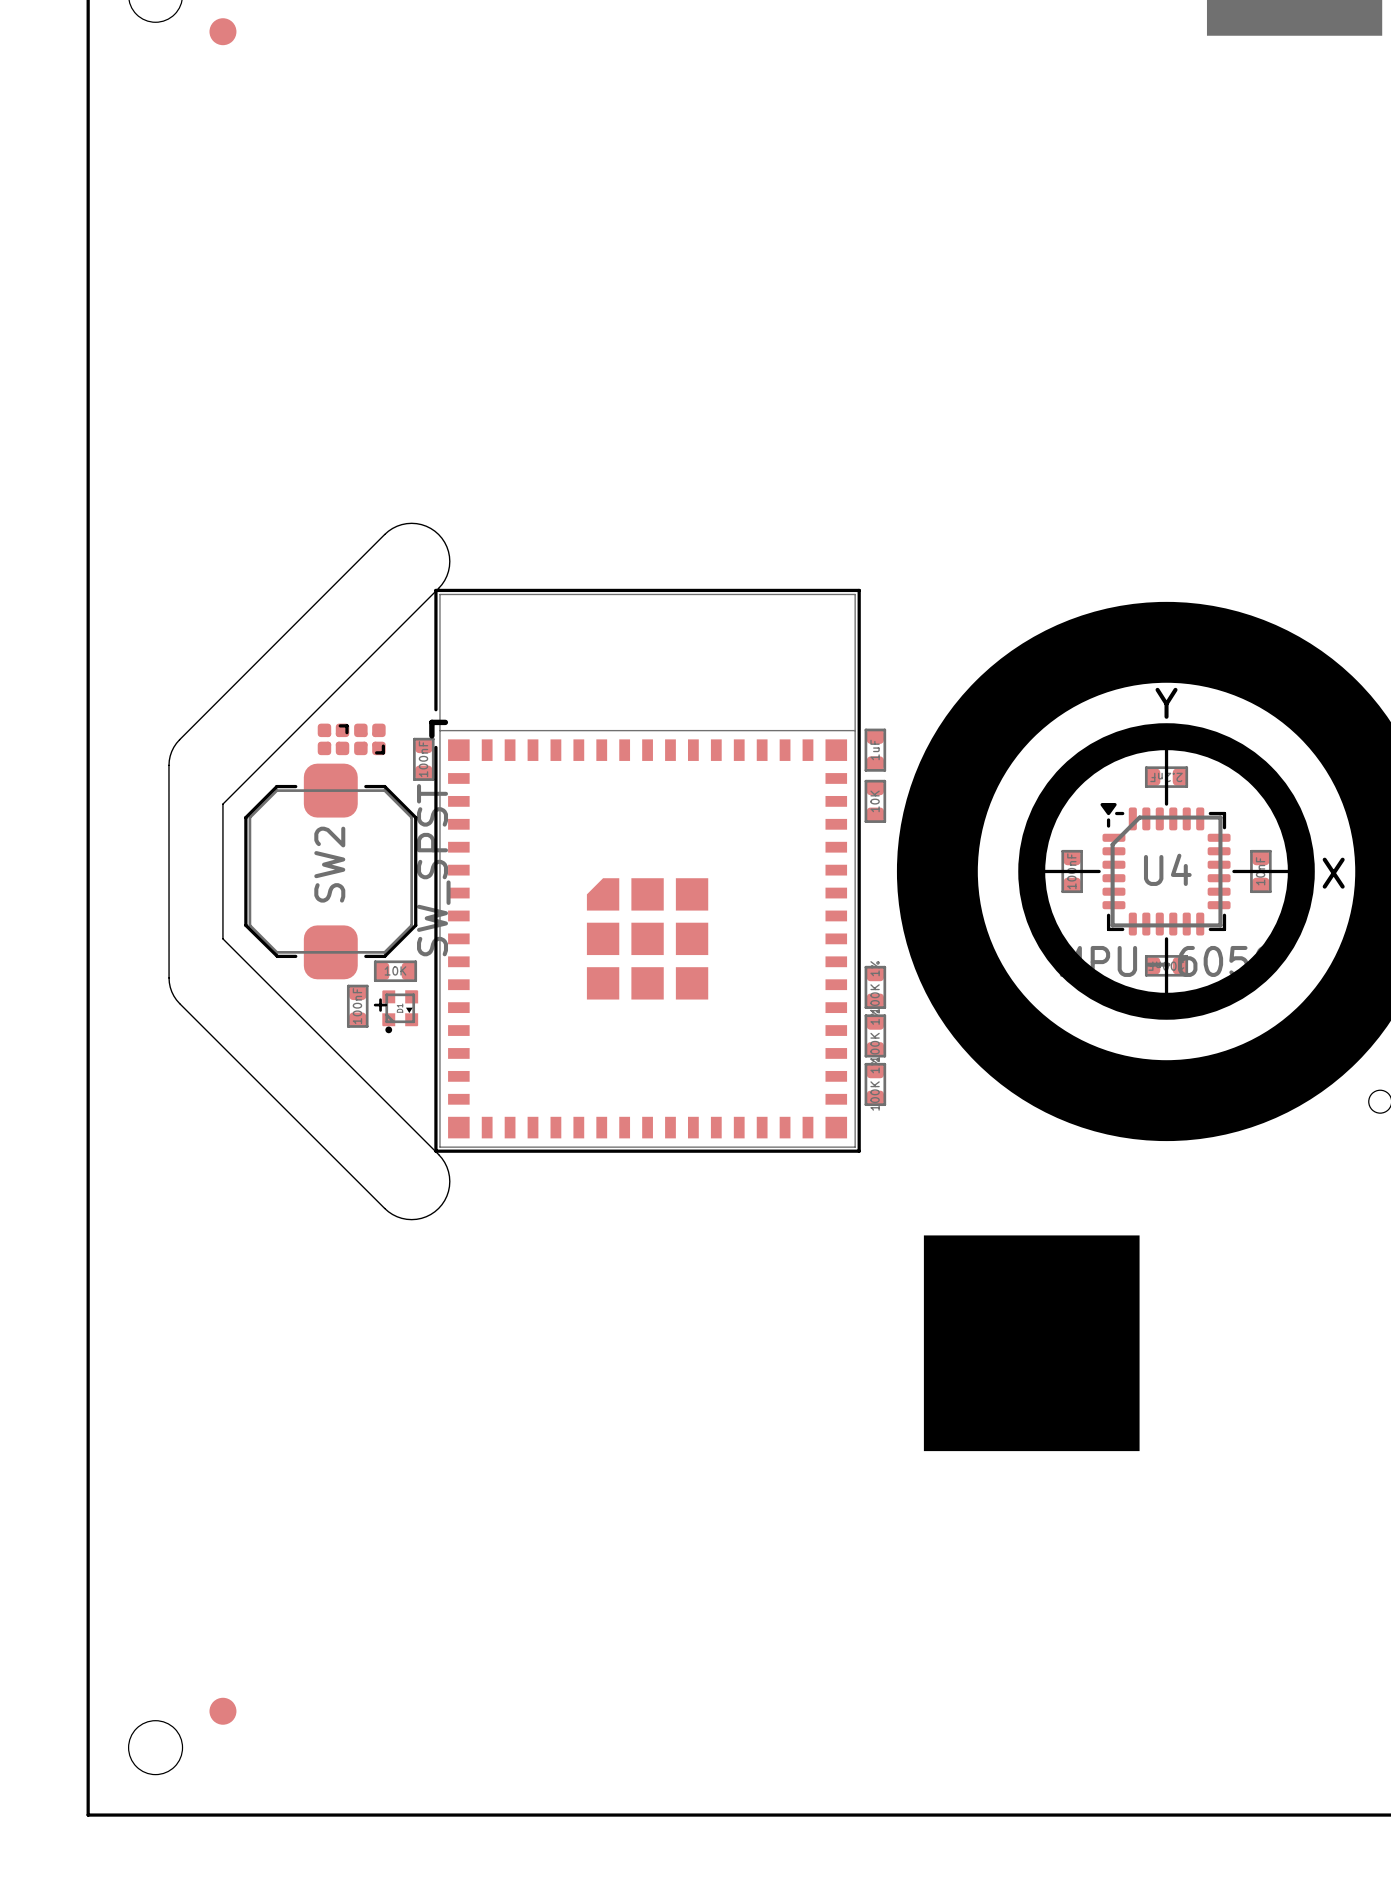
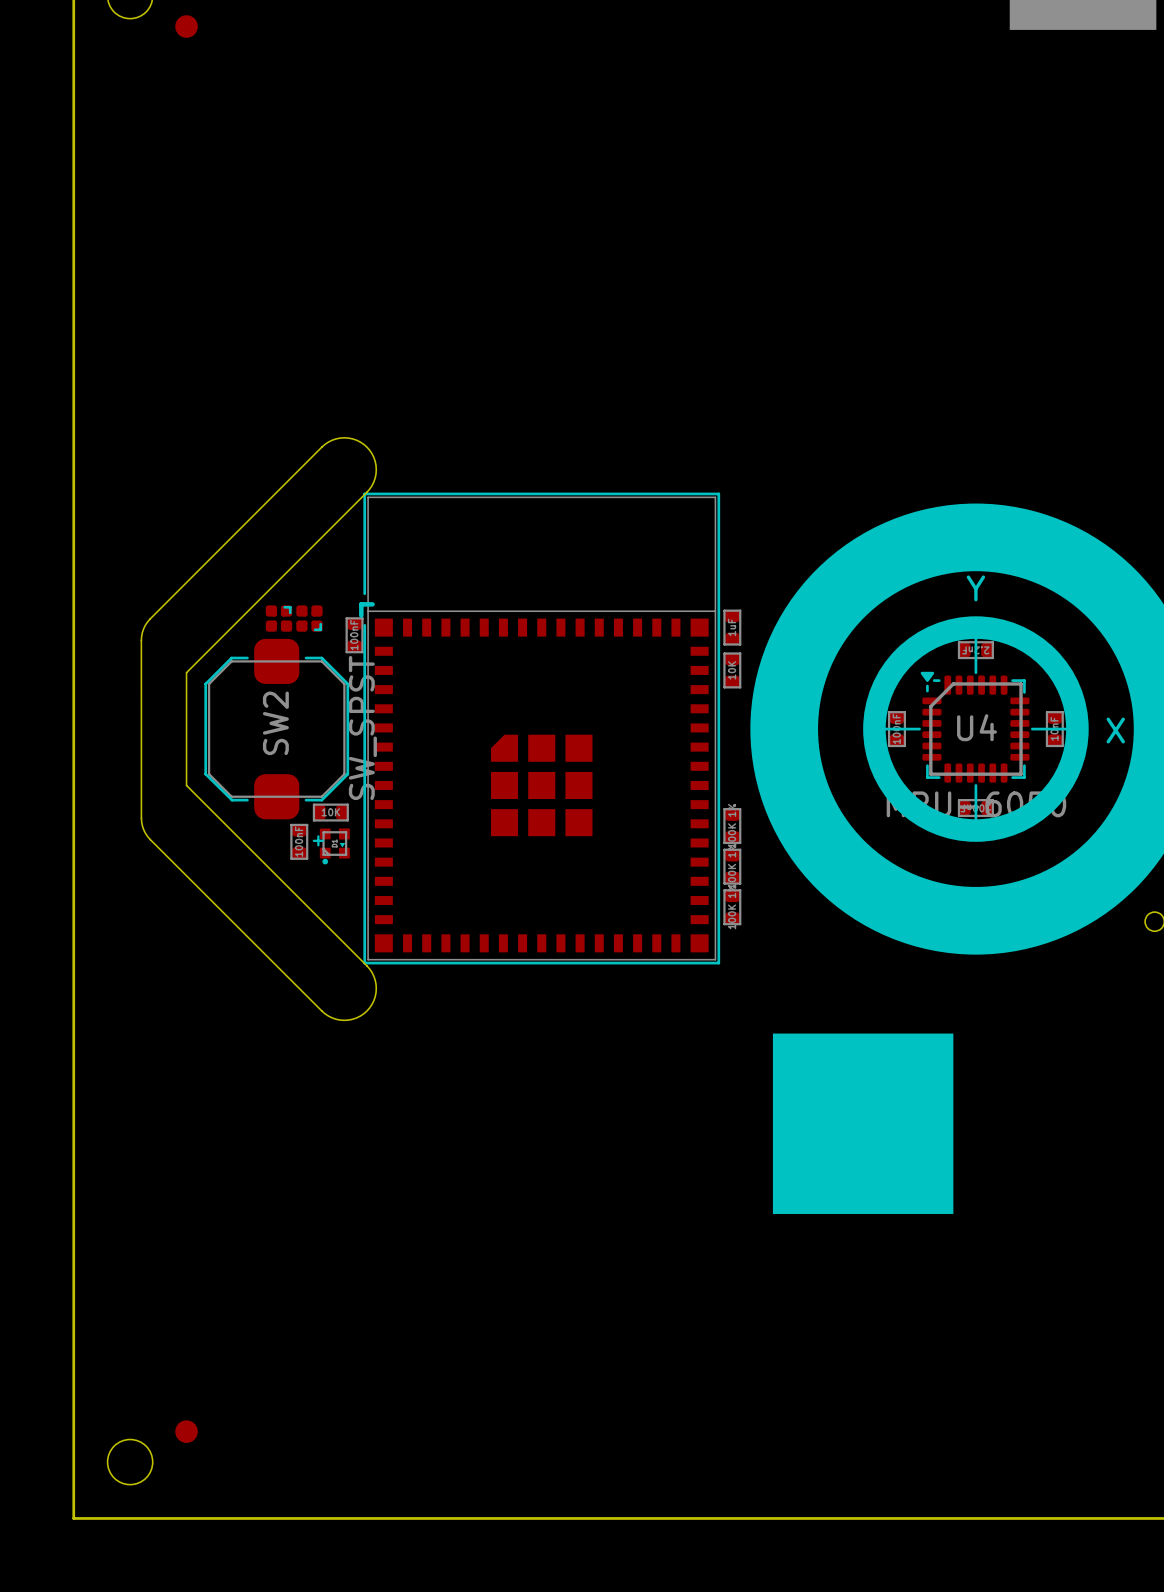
drawing shape: [1018, 723, 1315, 1020] -> [863, 616, 1089, 842]

